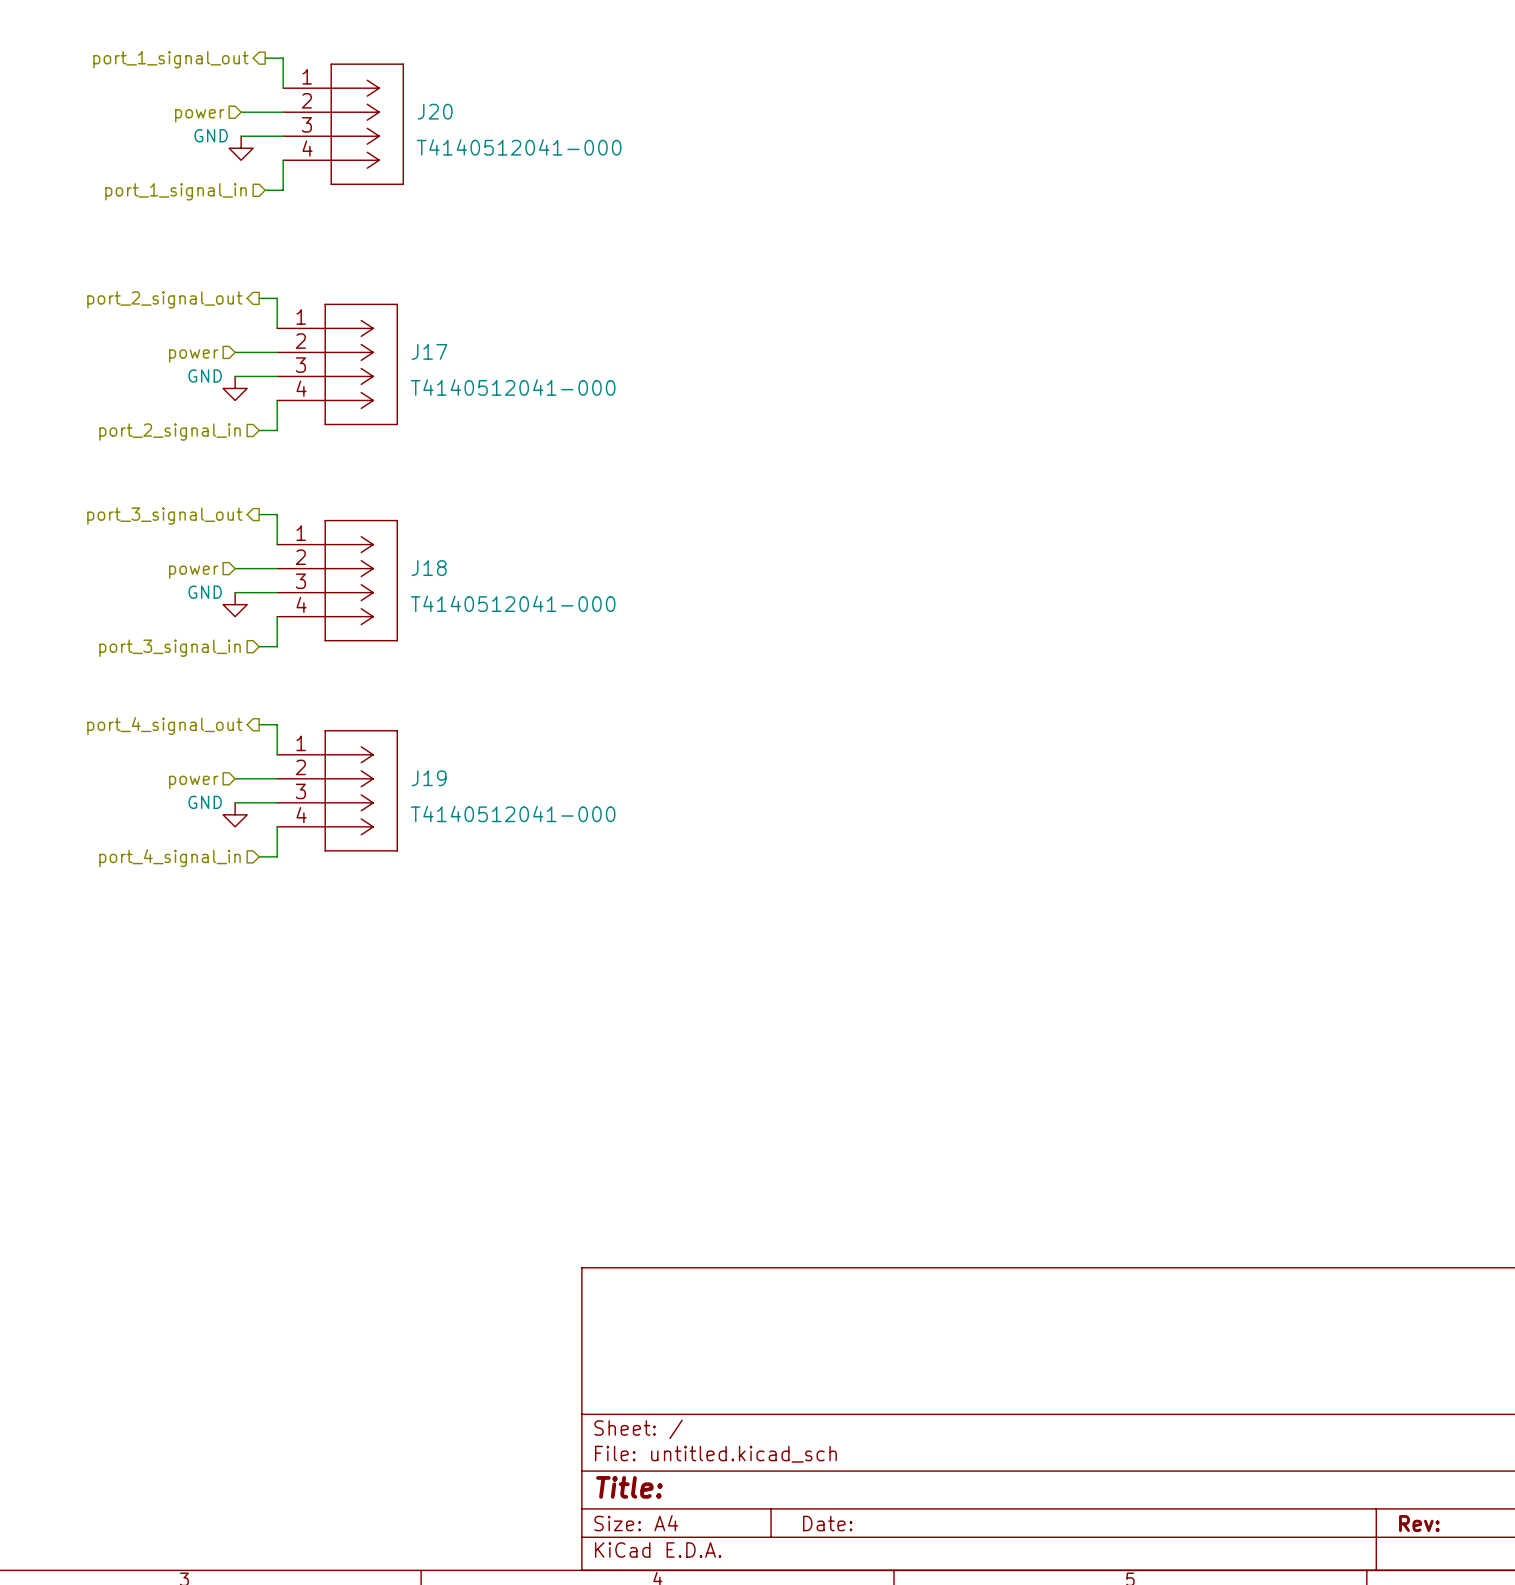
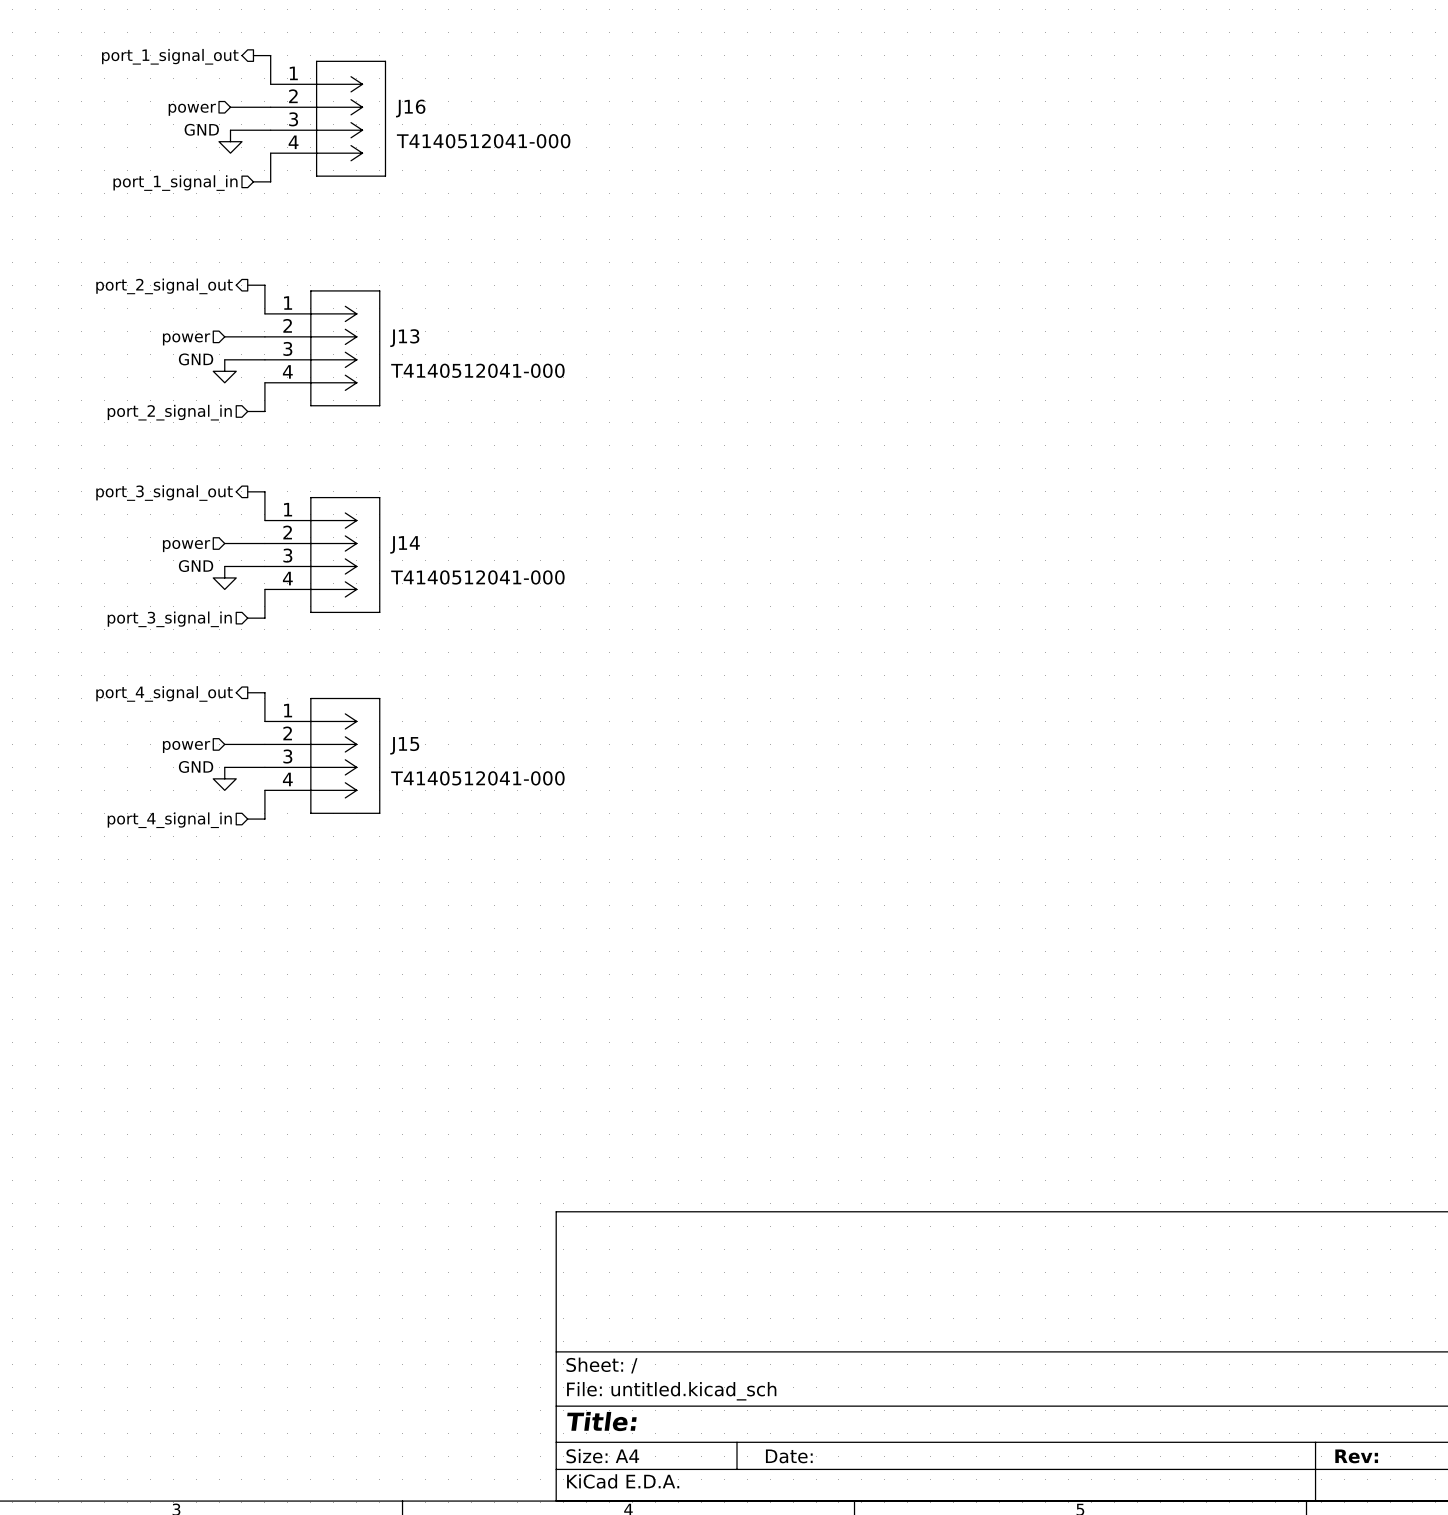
J20 name: J20 (435, 111) -> J16 (410, 108)
J17 name: J17 (429, 351) -> J13 (404, 338)
J18 name: J18 (429, 568) -> J14 (405, 544)
J19 name: J19 (429, 778) -> J15 (404, 745)

